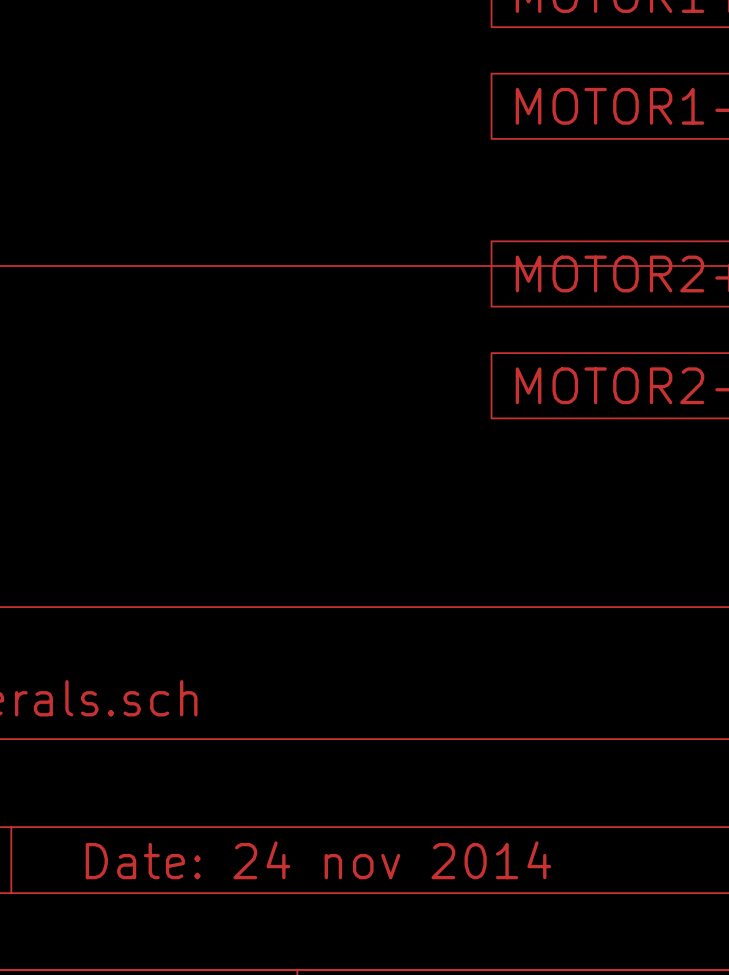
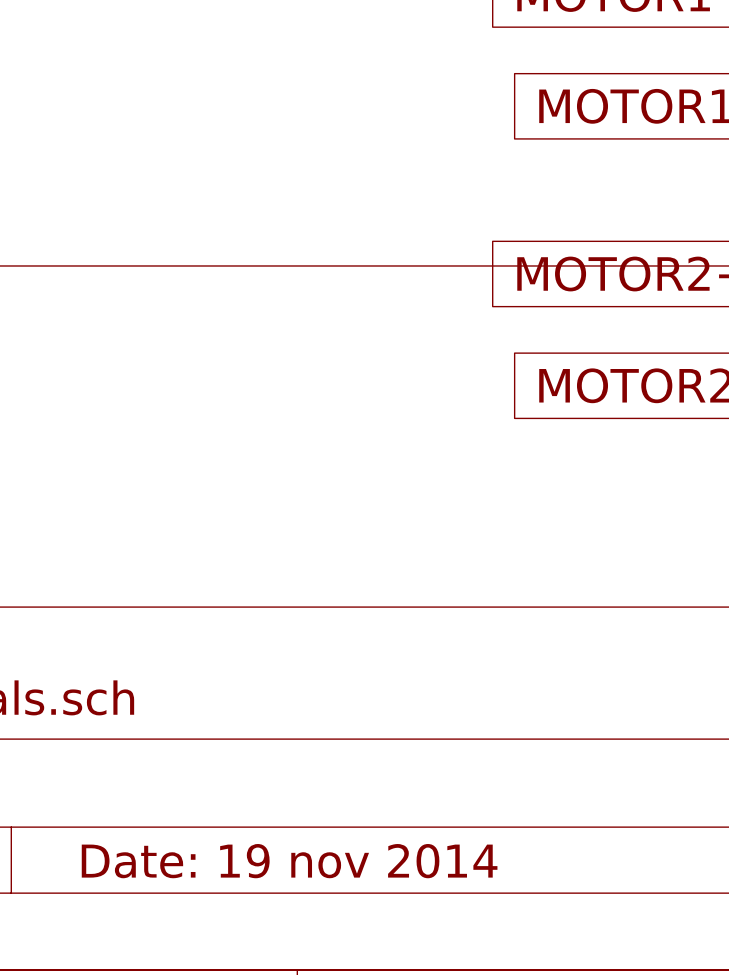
title block: Date: 24 nov 2014 (318, 860) -> Date: 19 nov 2014 (289, 861)

